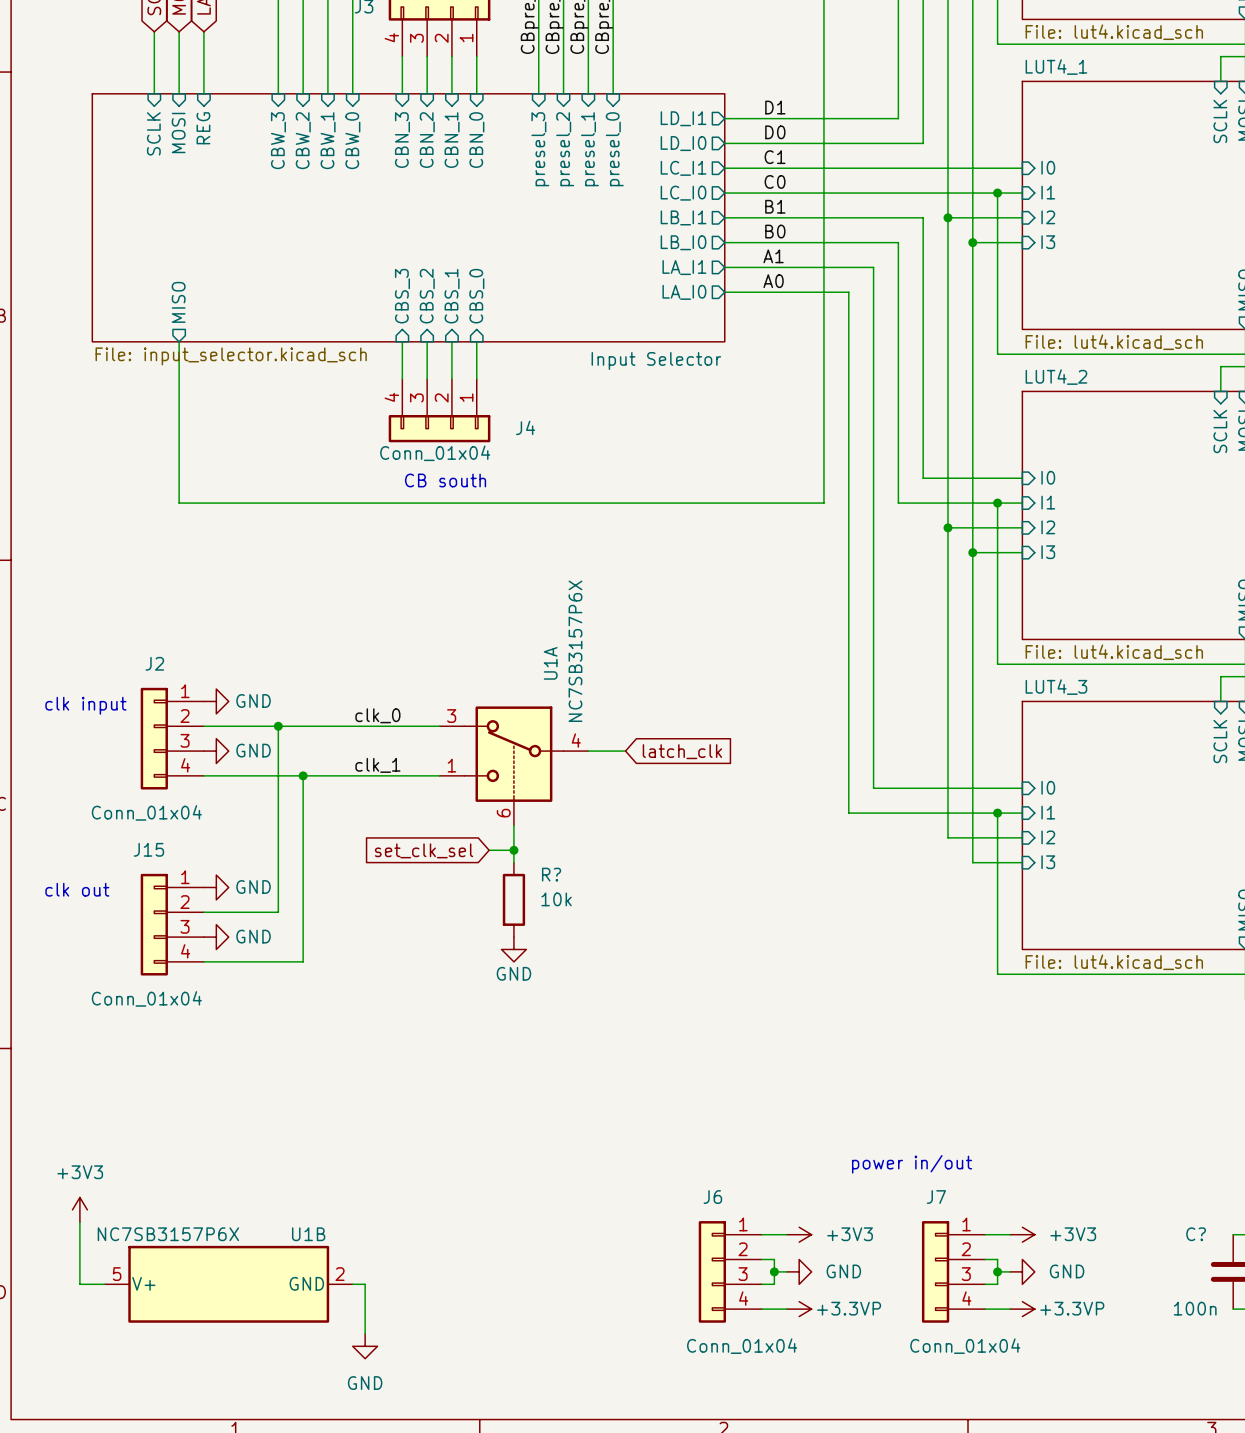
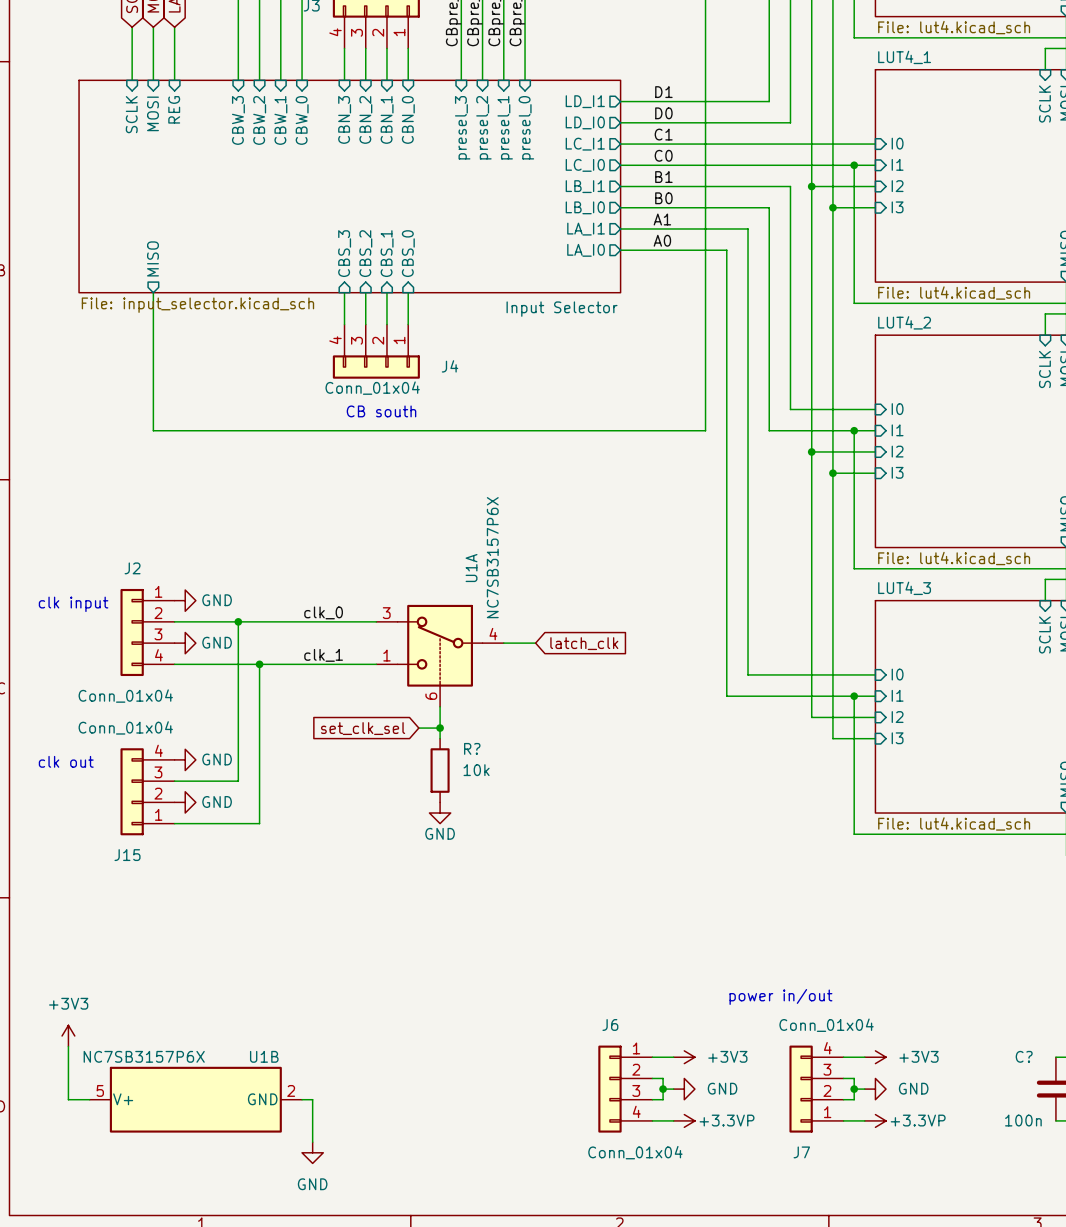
J15 flip: as is (154, 924) -> up-down (132, 791)
J7 flip: as is (935, 1271) -> up-down (801, 1089)

